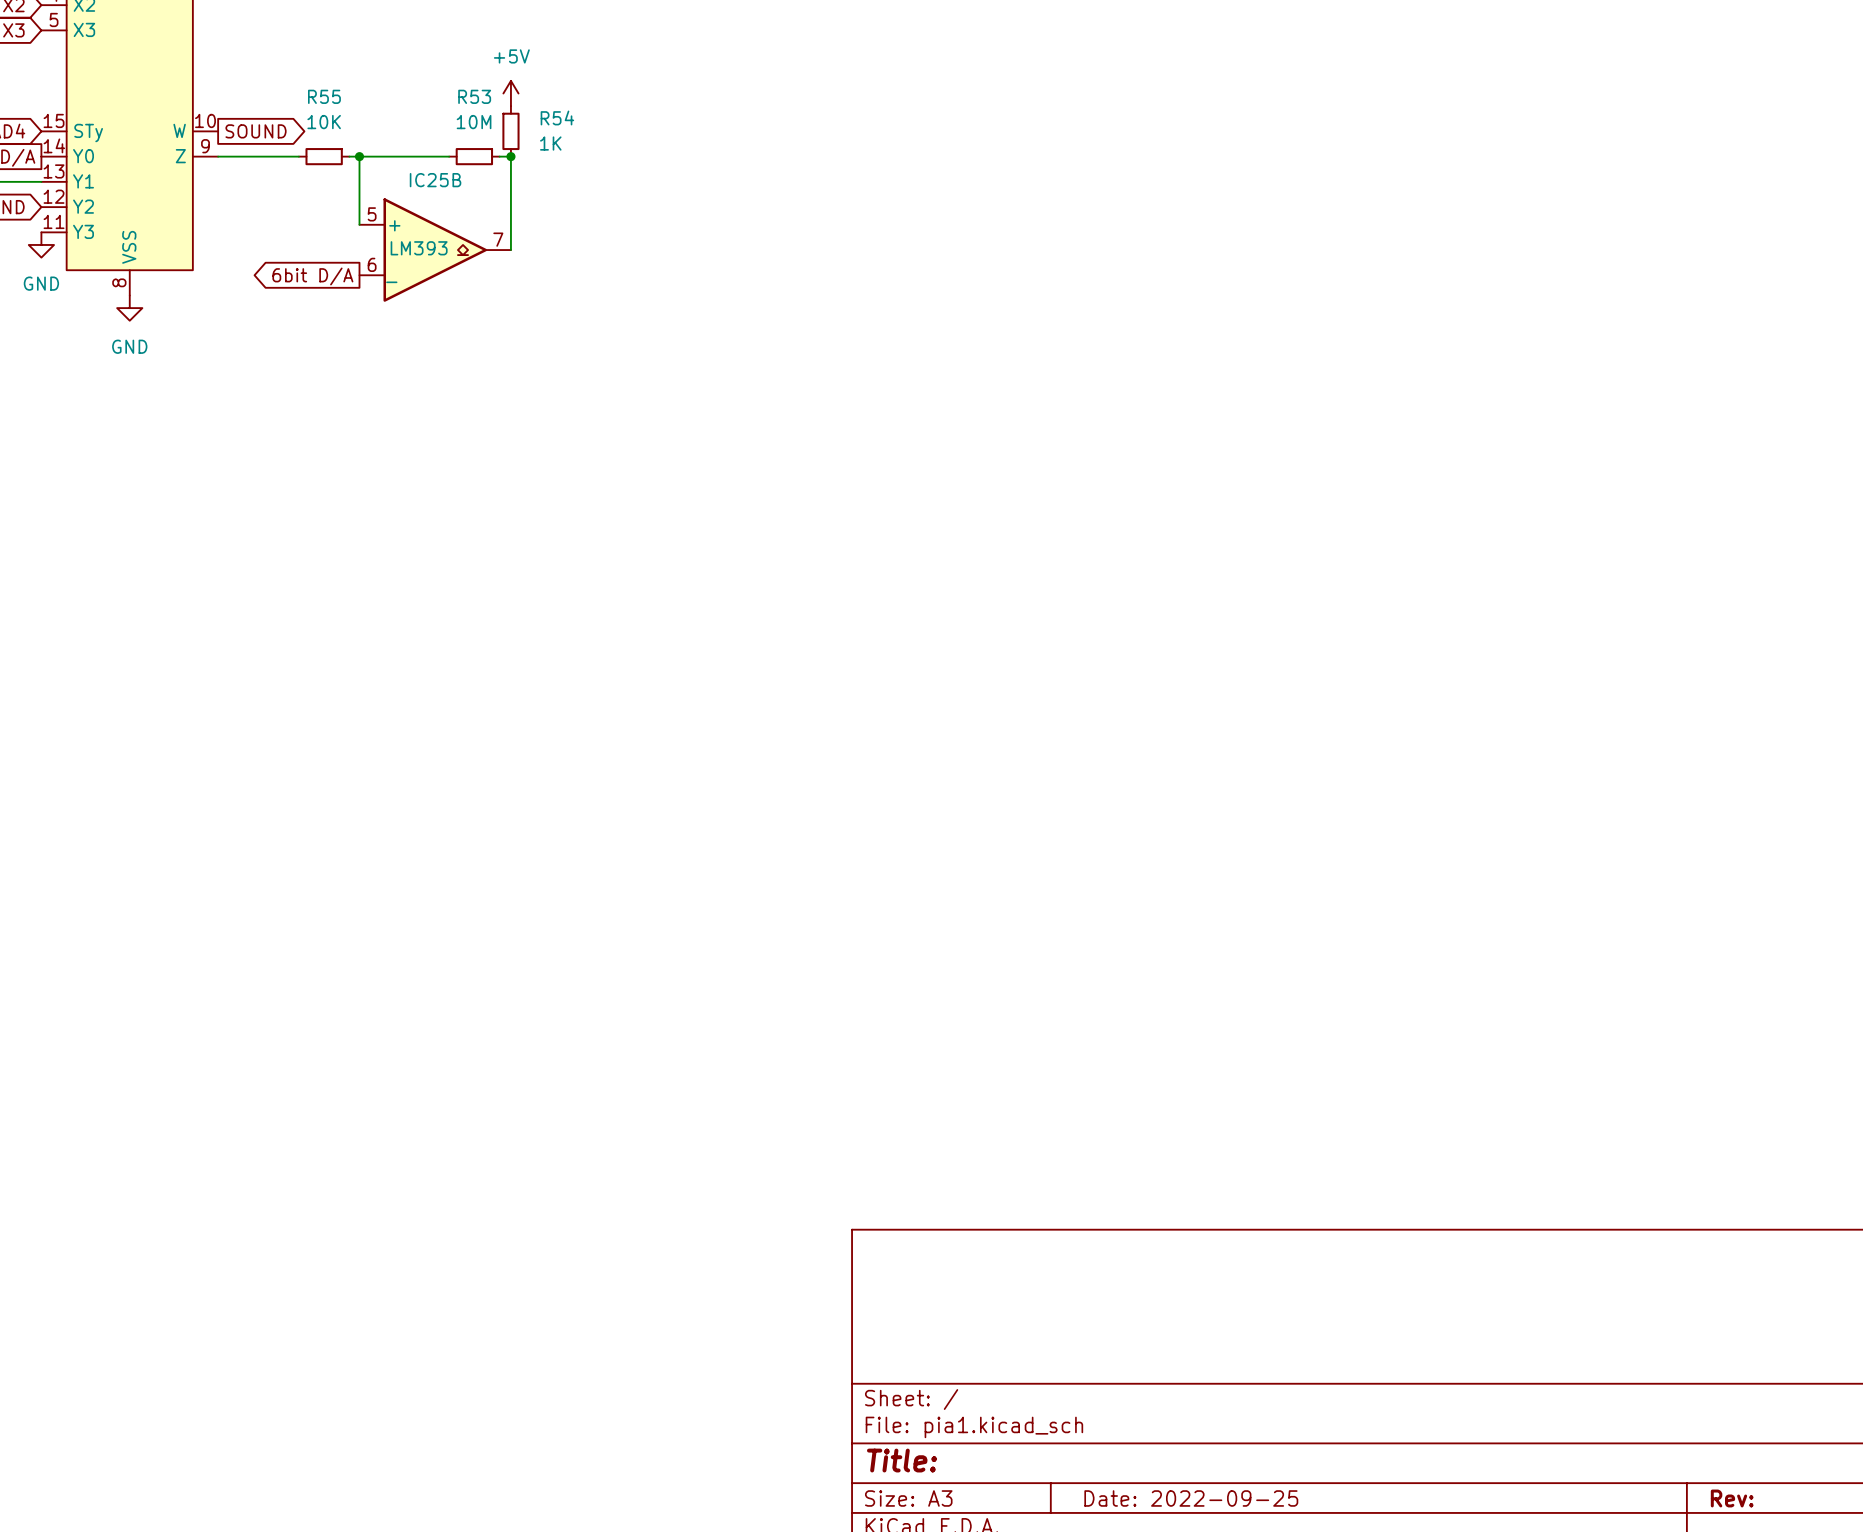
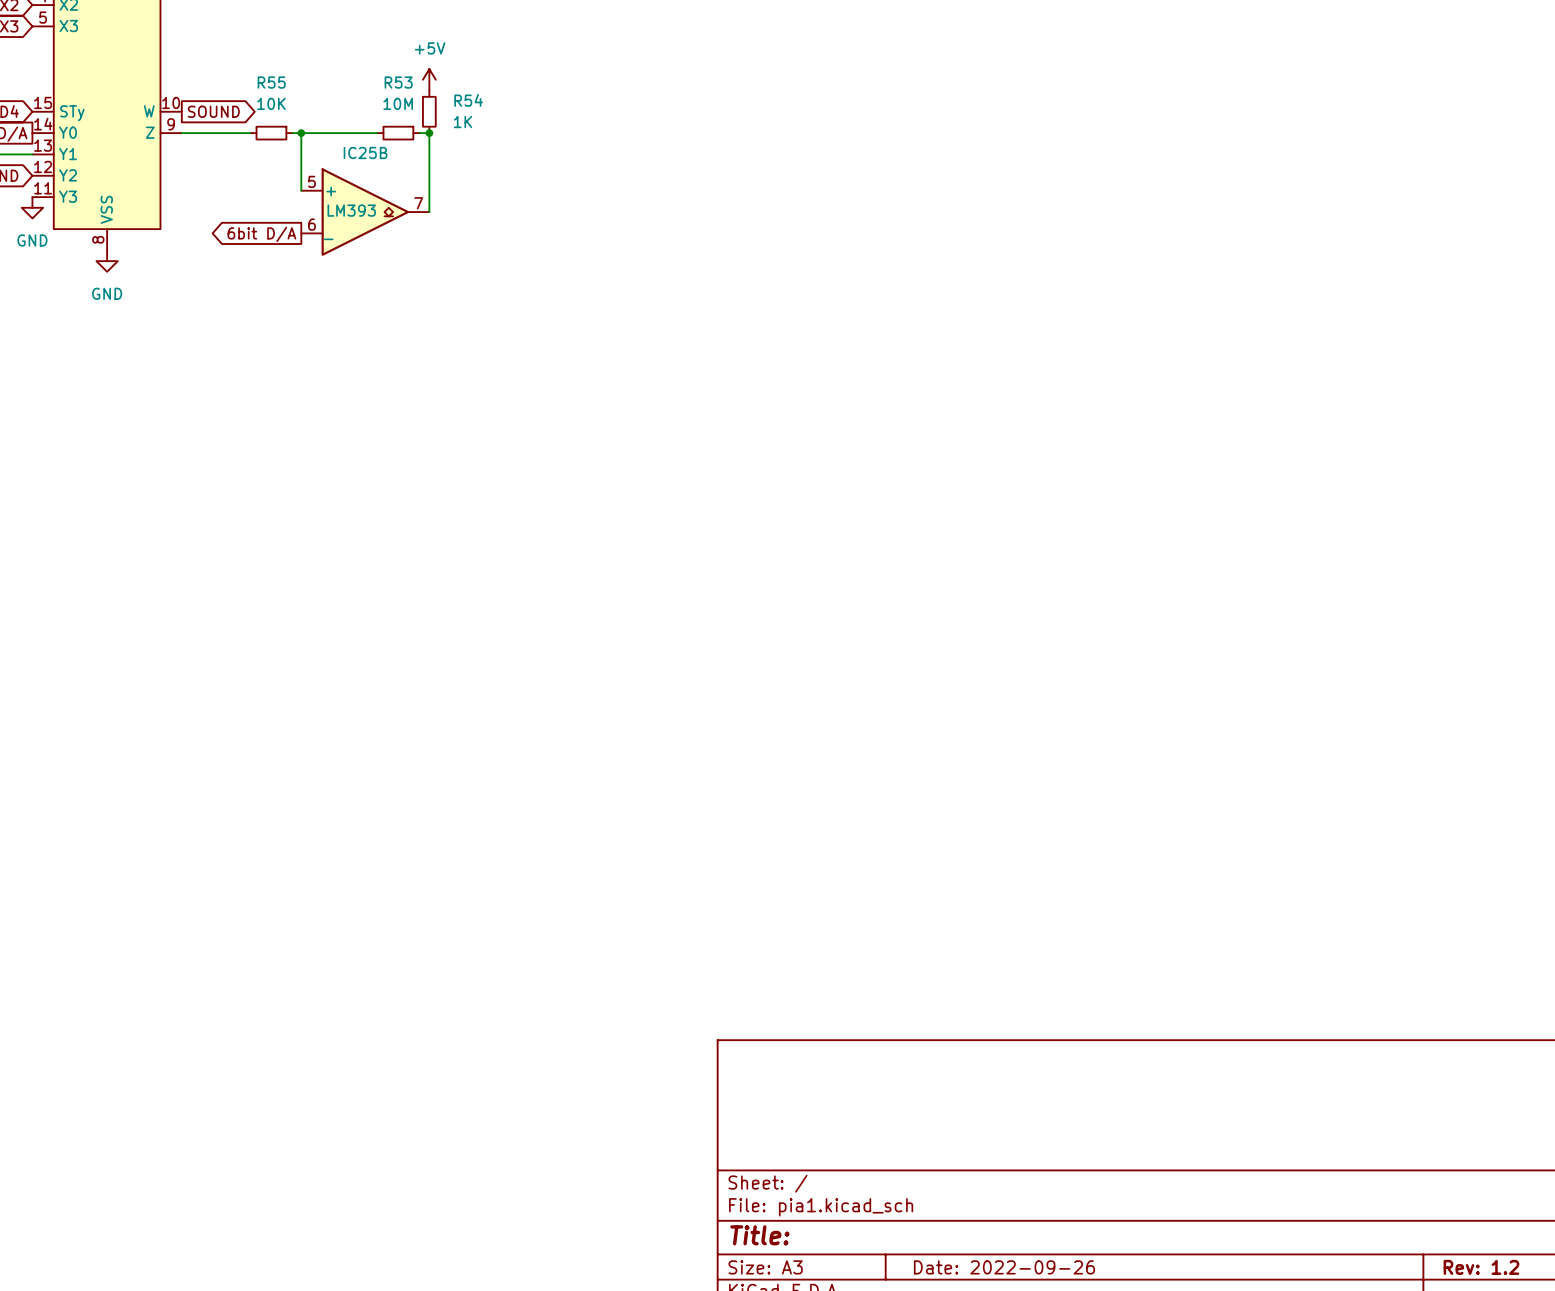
title block: Date: 2022-09-25 (1191, 1498) -> Date: 2022-09-26 (1004, 1267)
title block: Rev: (1732, 1498) -> Rev: 1.2 (1481, 1267)

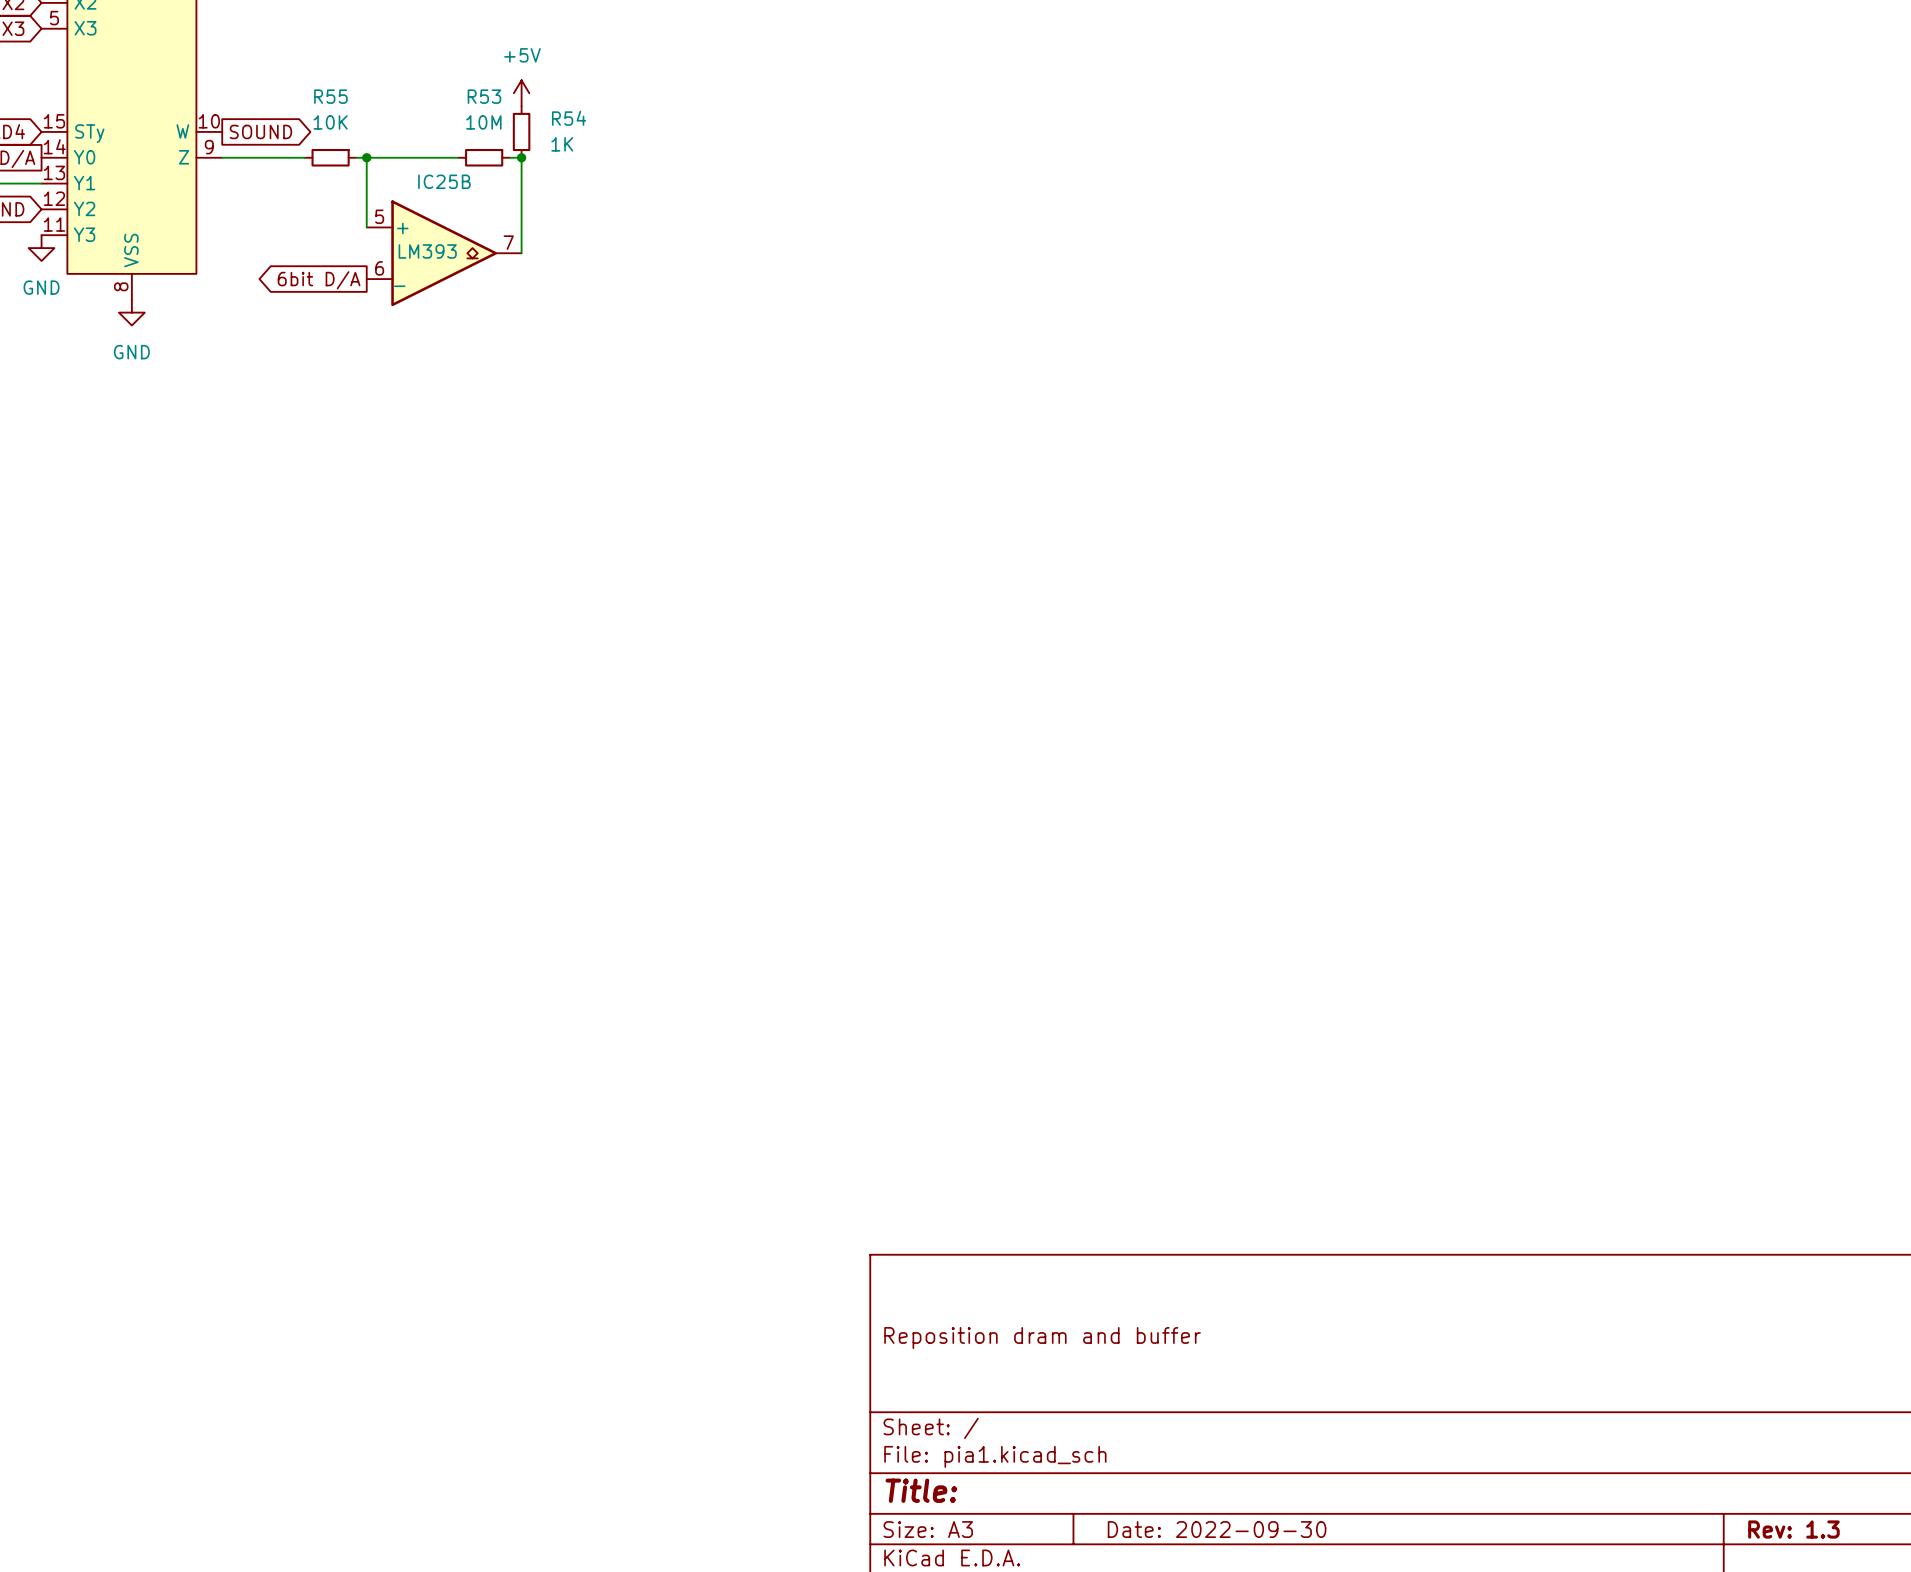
title block: none -> Reposition dram and buffer (1042, 1338)
title block: Date: 2022-09-26 (1004, 1267) -> Date: 2022-09-30 (1217, 1529)
title block: Rev: 1.2 (1481, 1267) -> Rev: 1.3 (1793, 1529)

